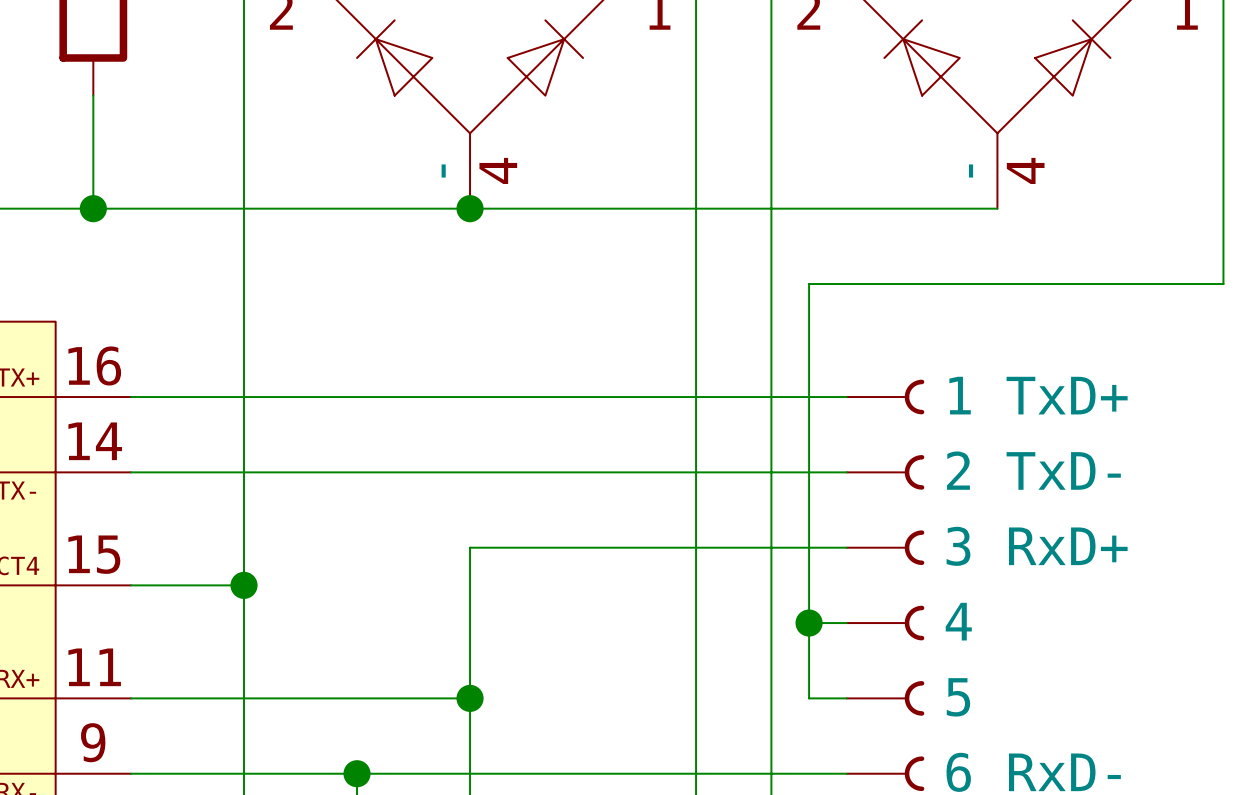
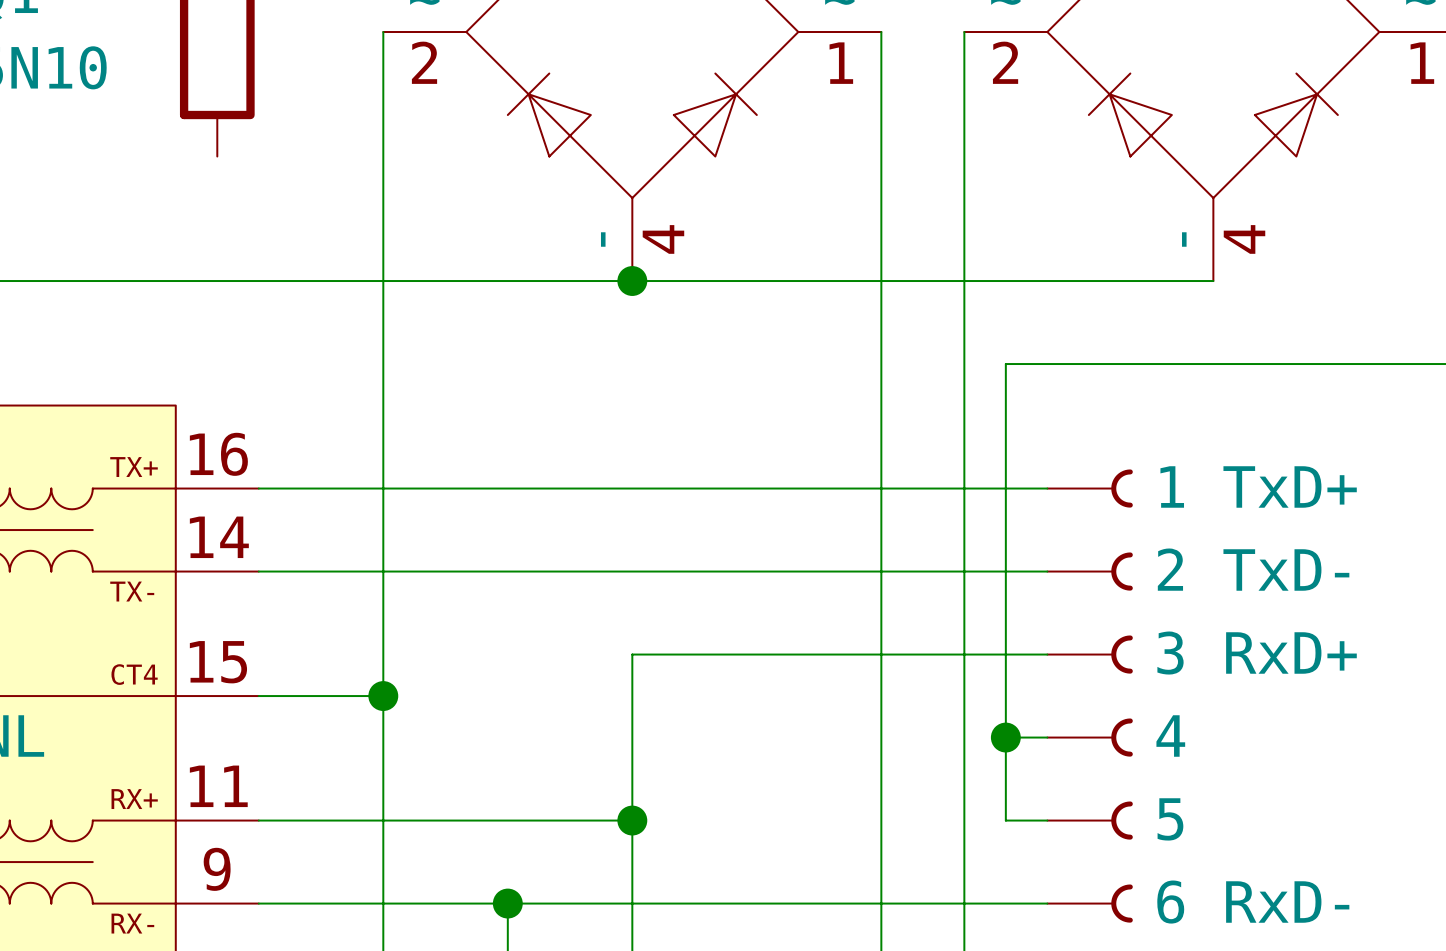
wire: (93, 95) (93, 208) -> none
junction: (93, 208) -> none

